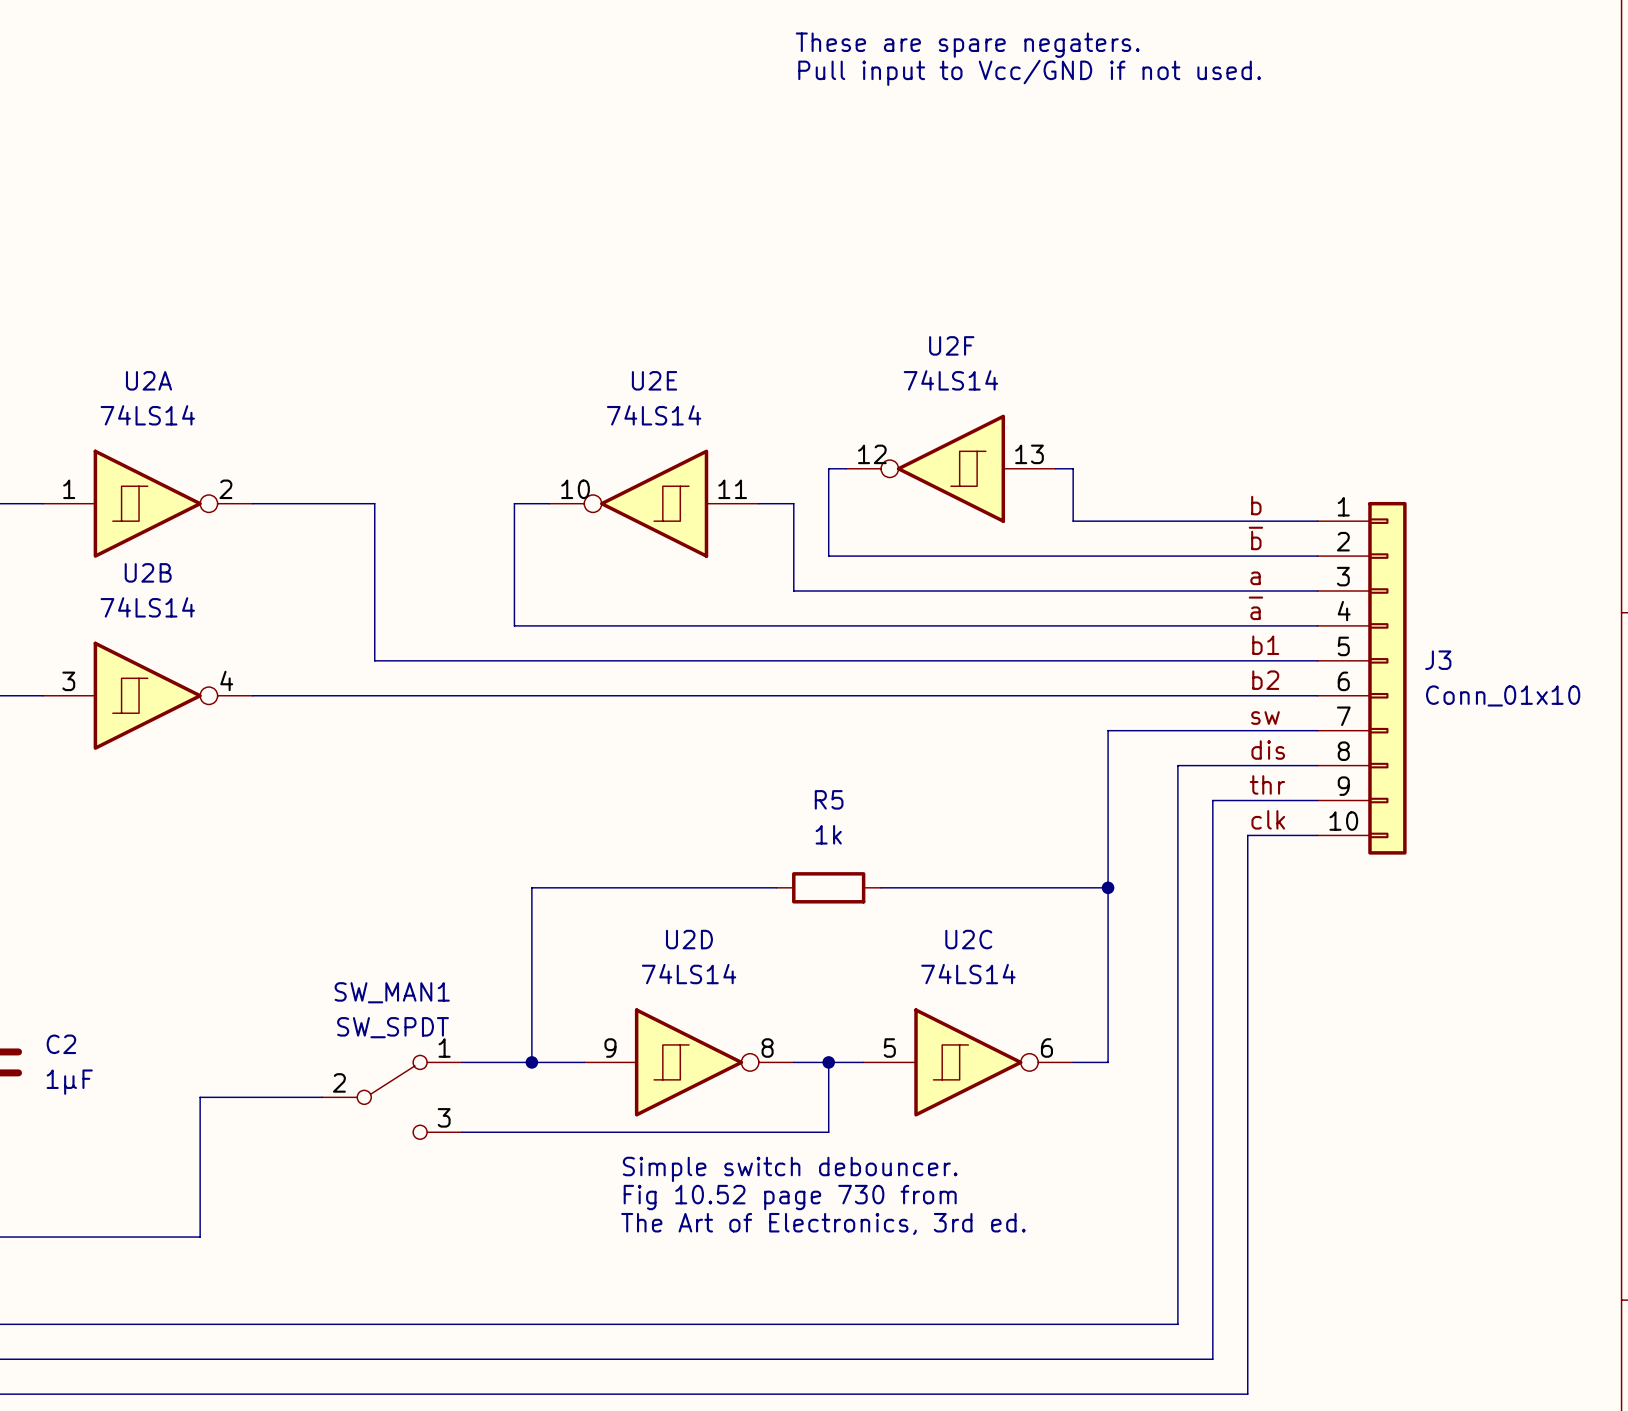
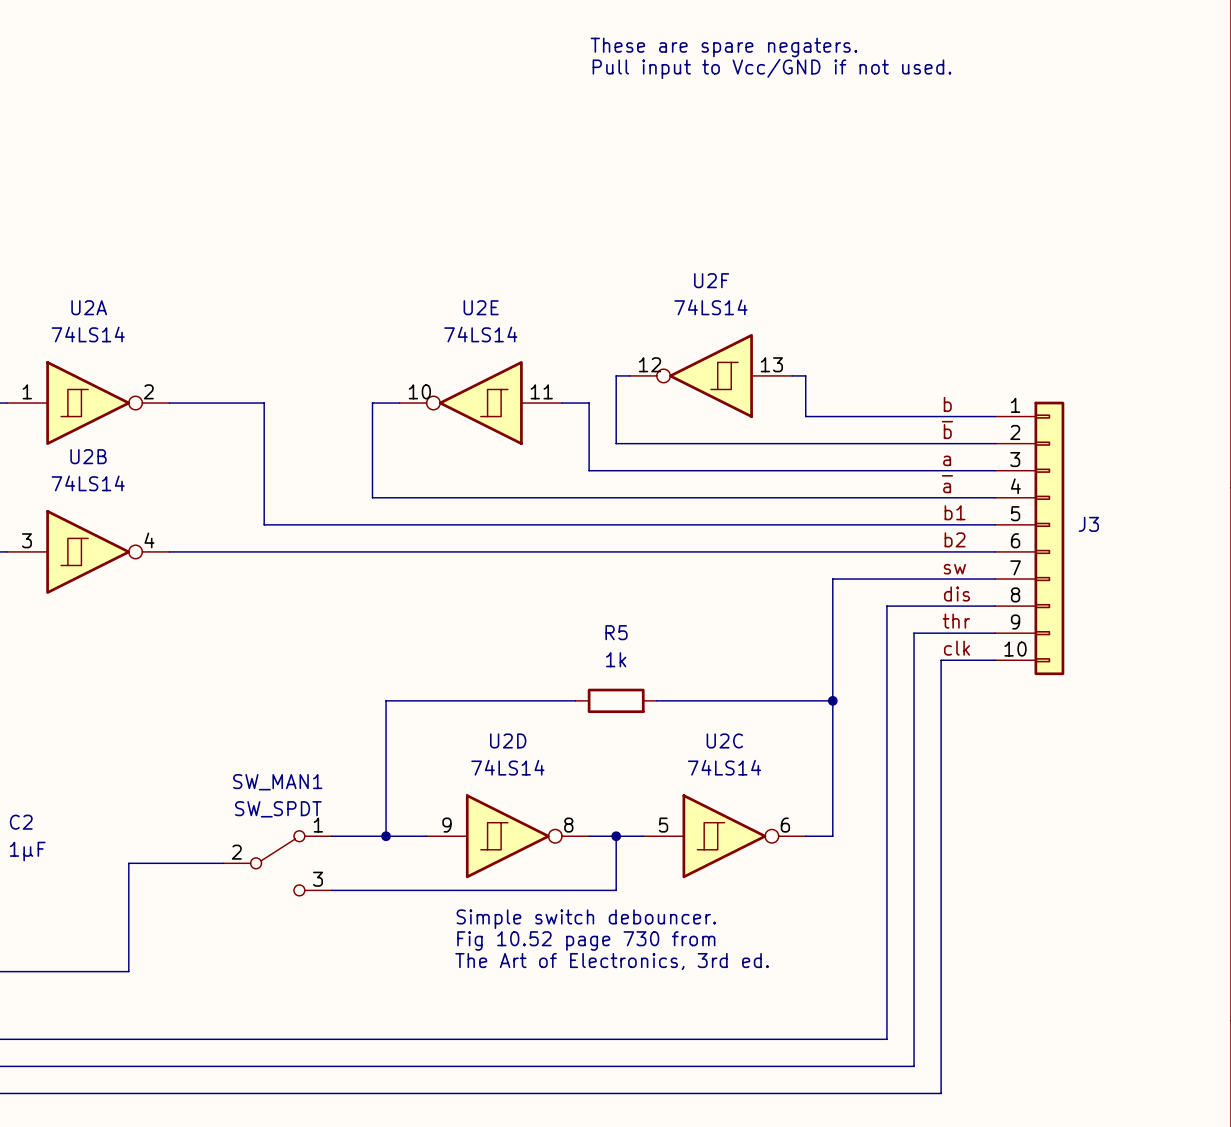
J3 value: Conn_01x10 (1503, 695) -> none

